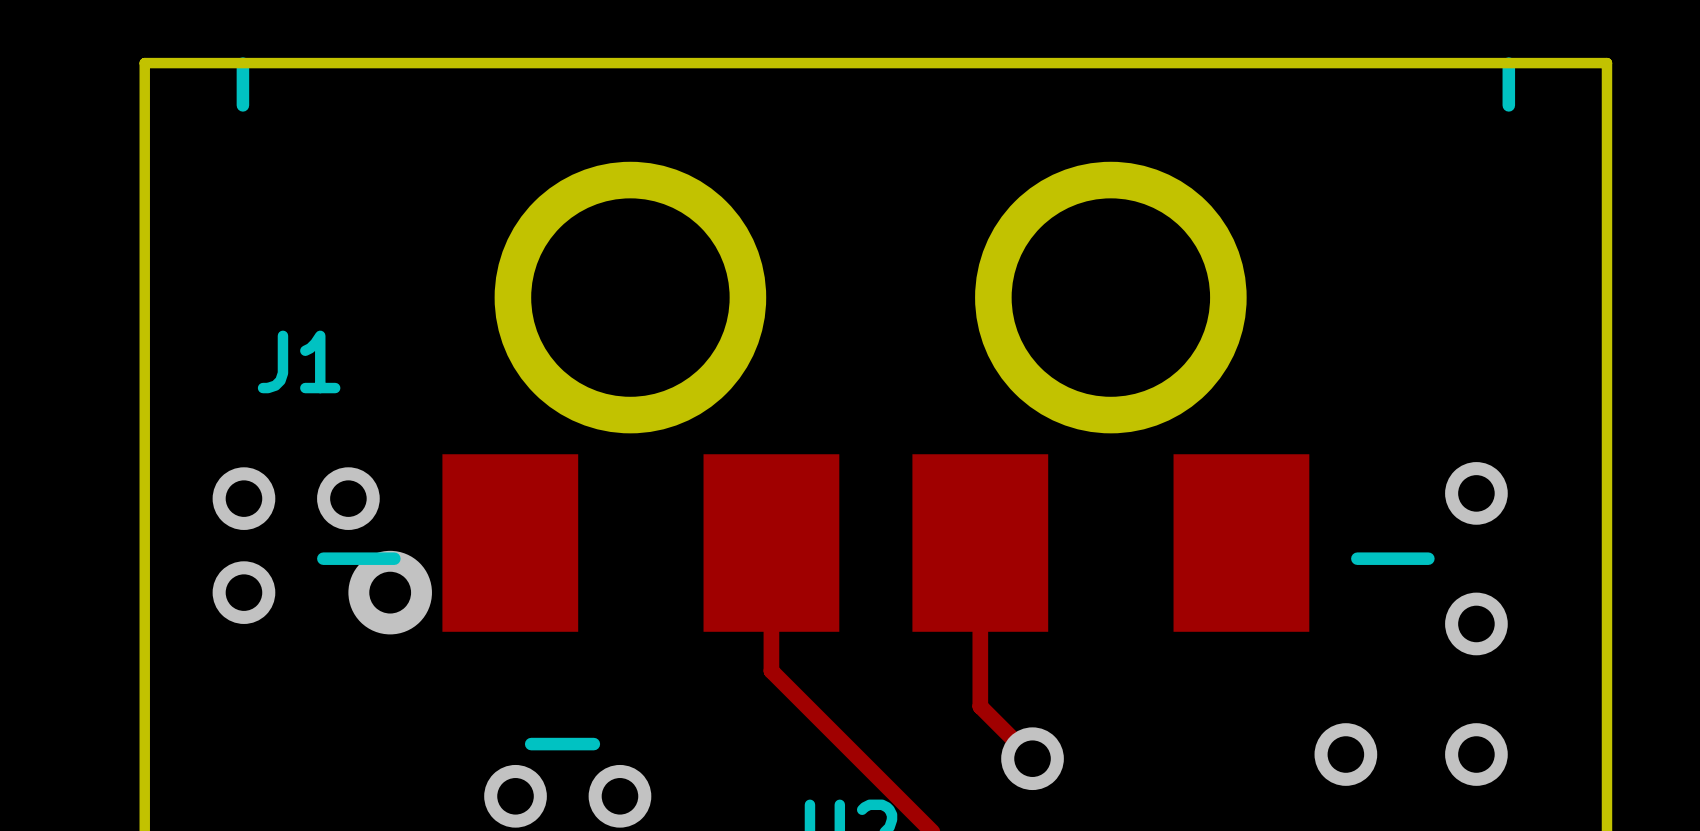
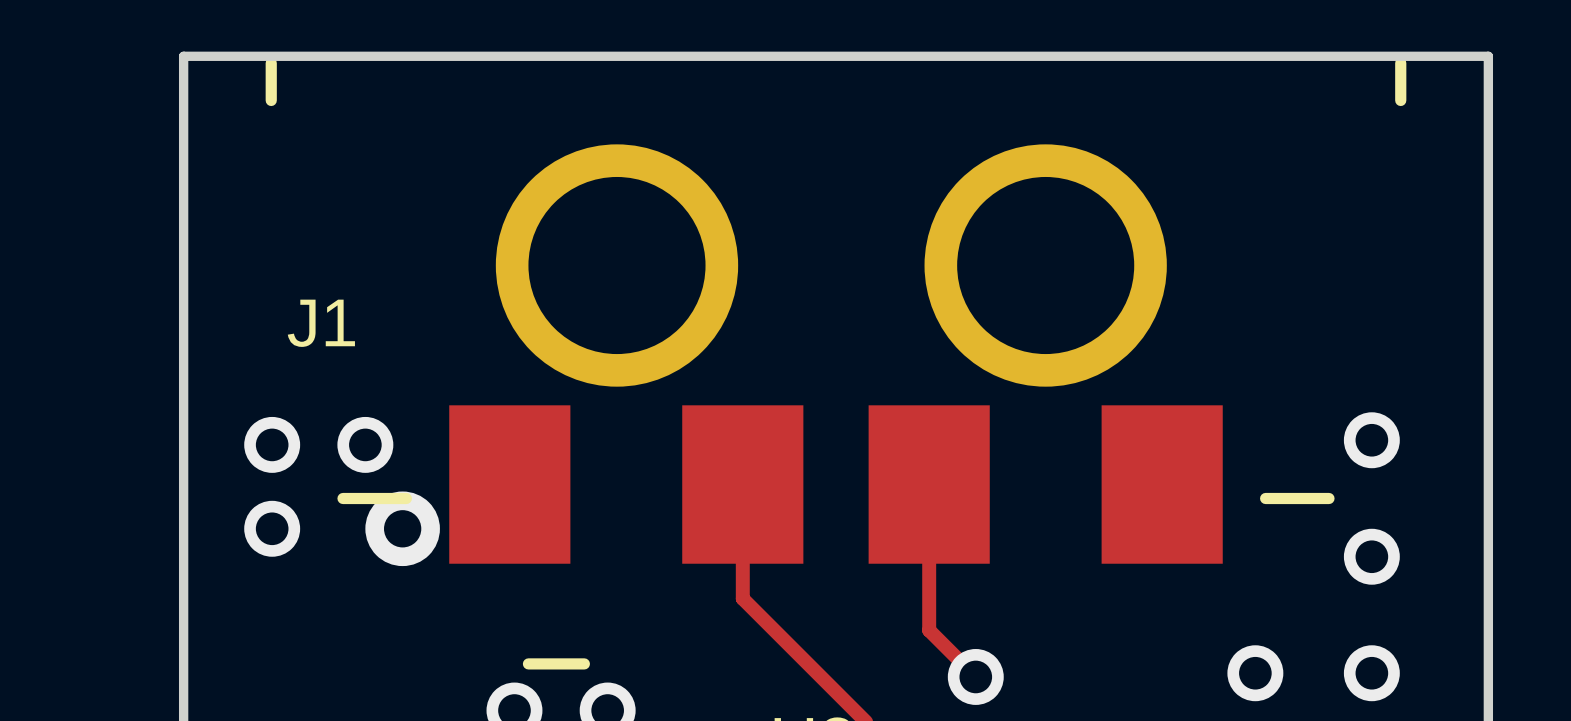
J1 footprint: [236, 57, 1516, 751] -> [265, 57, 1407, 670]

